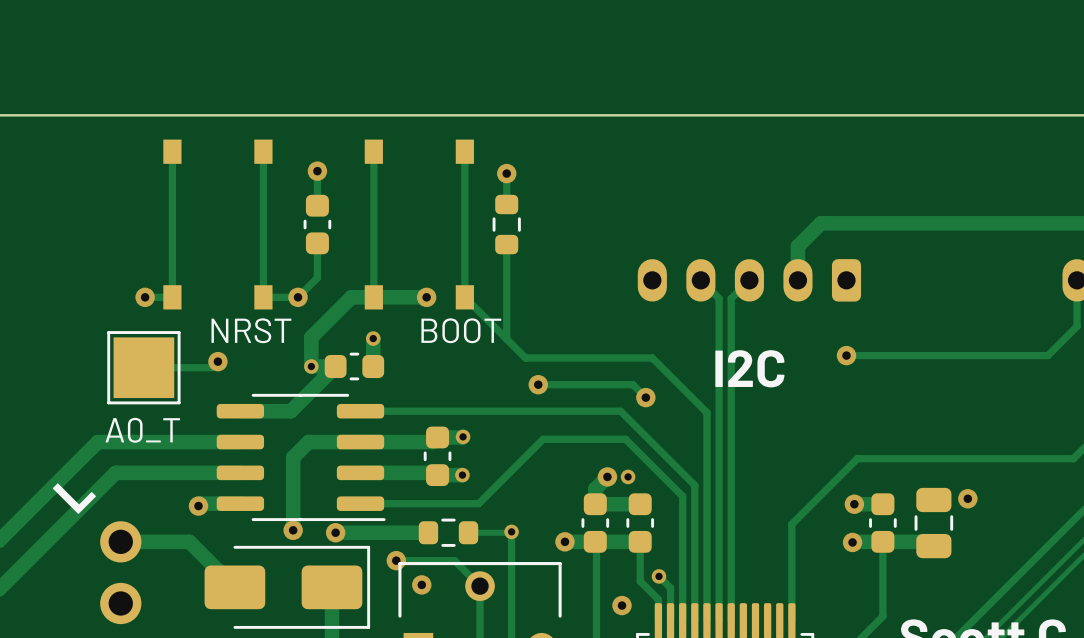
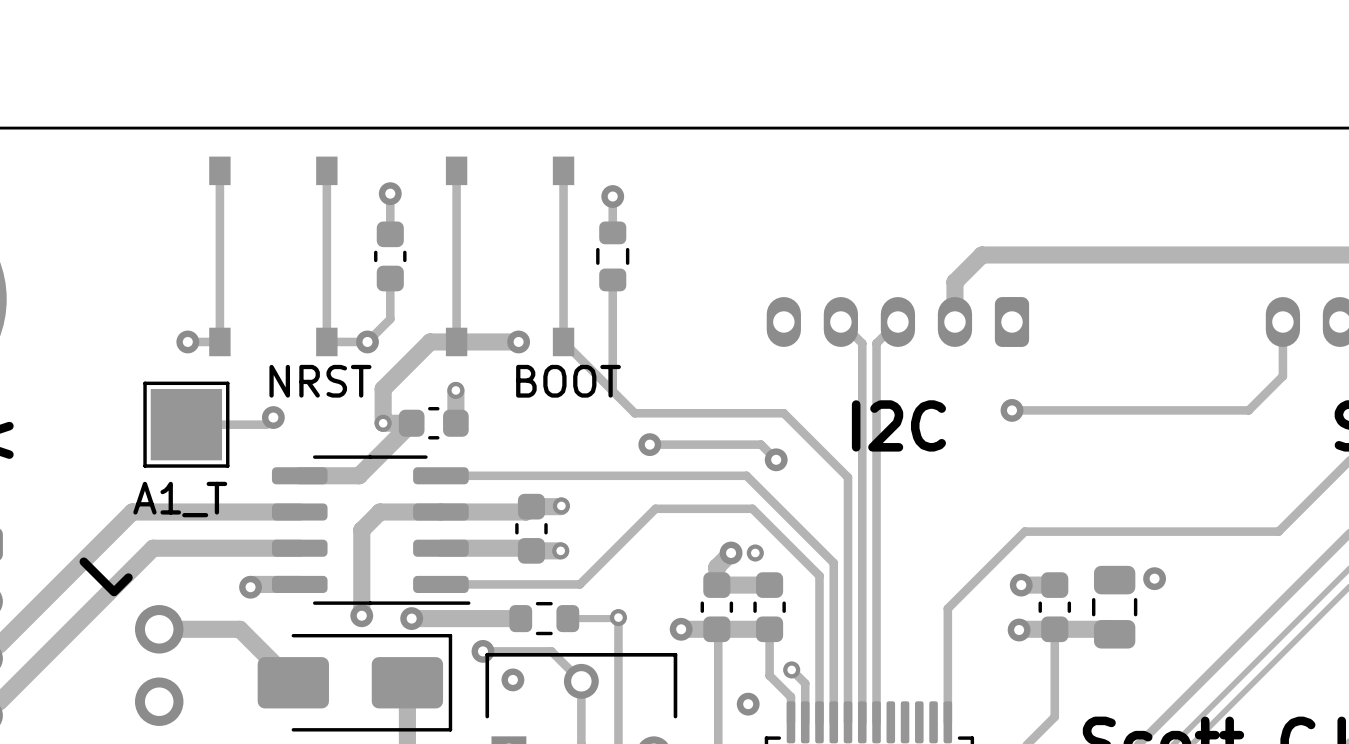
text: A0_T (142, 430) -> A1_T (180, 499)

